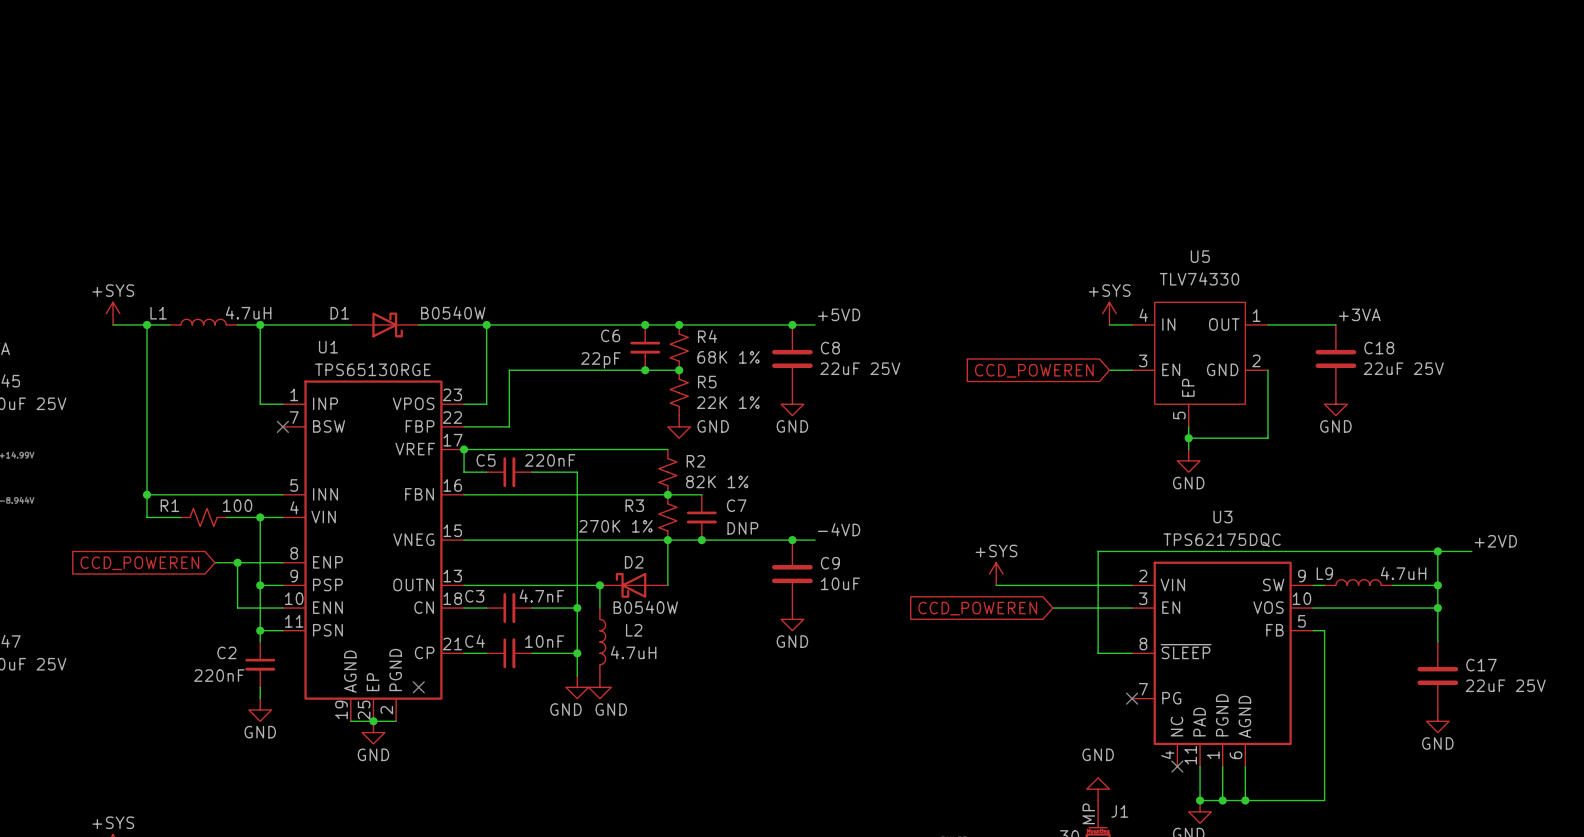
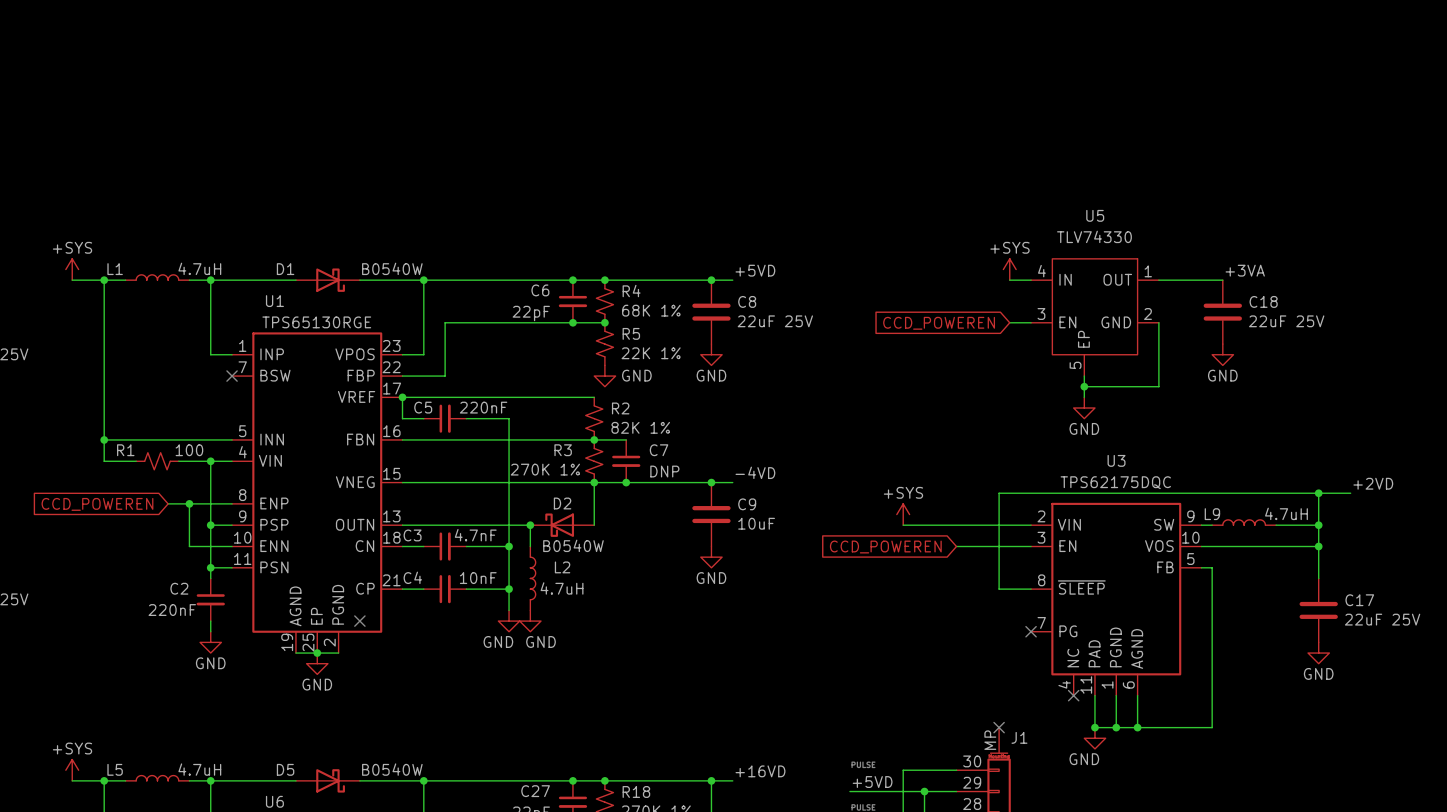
power symbol: GND (1098, 789) -> none
no-connect mark: none -> (999, 727)

